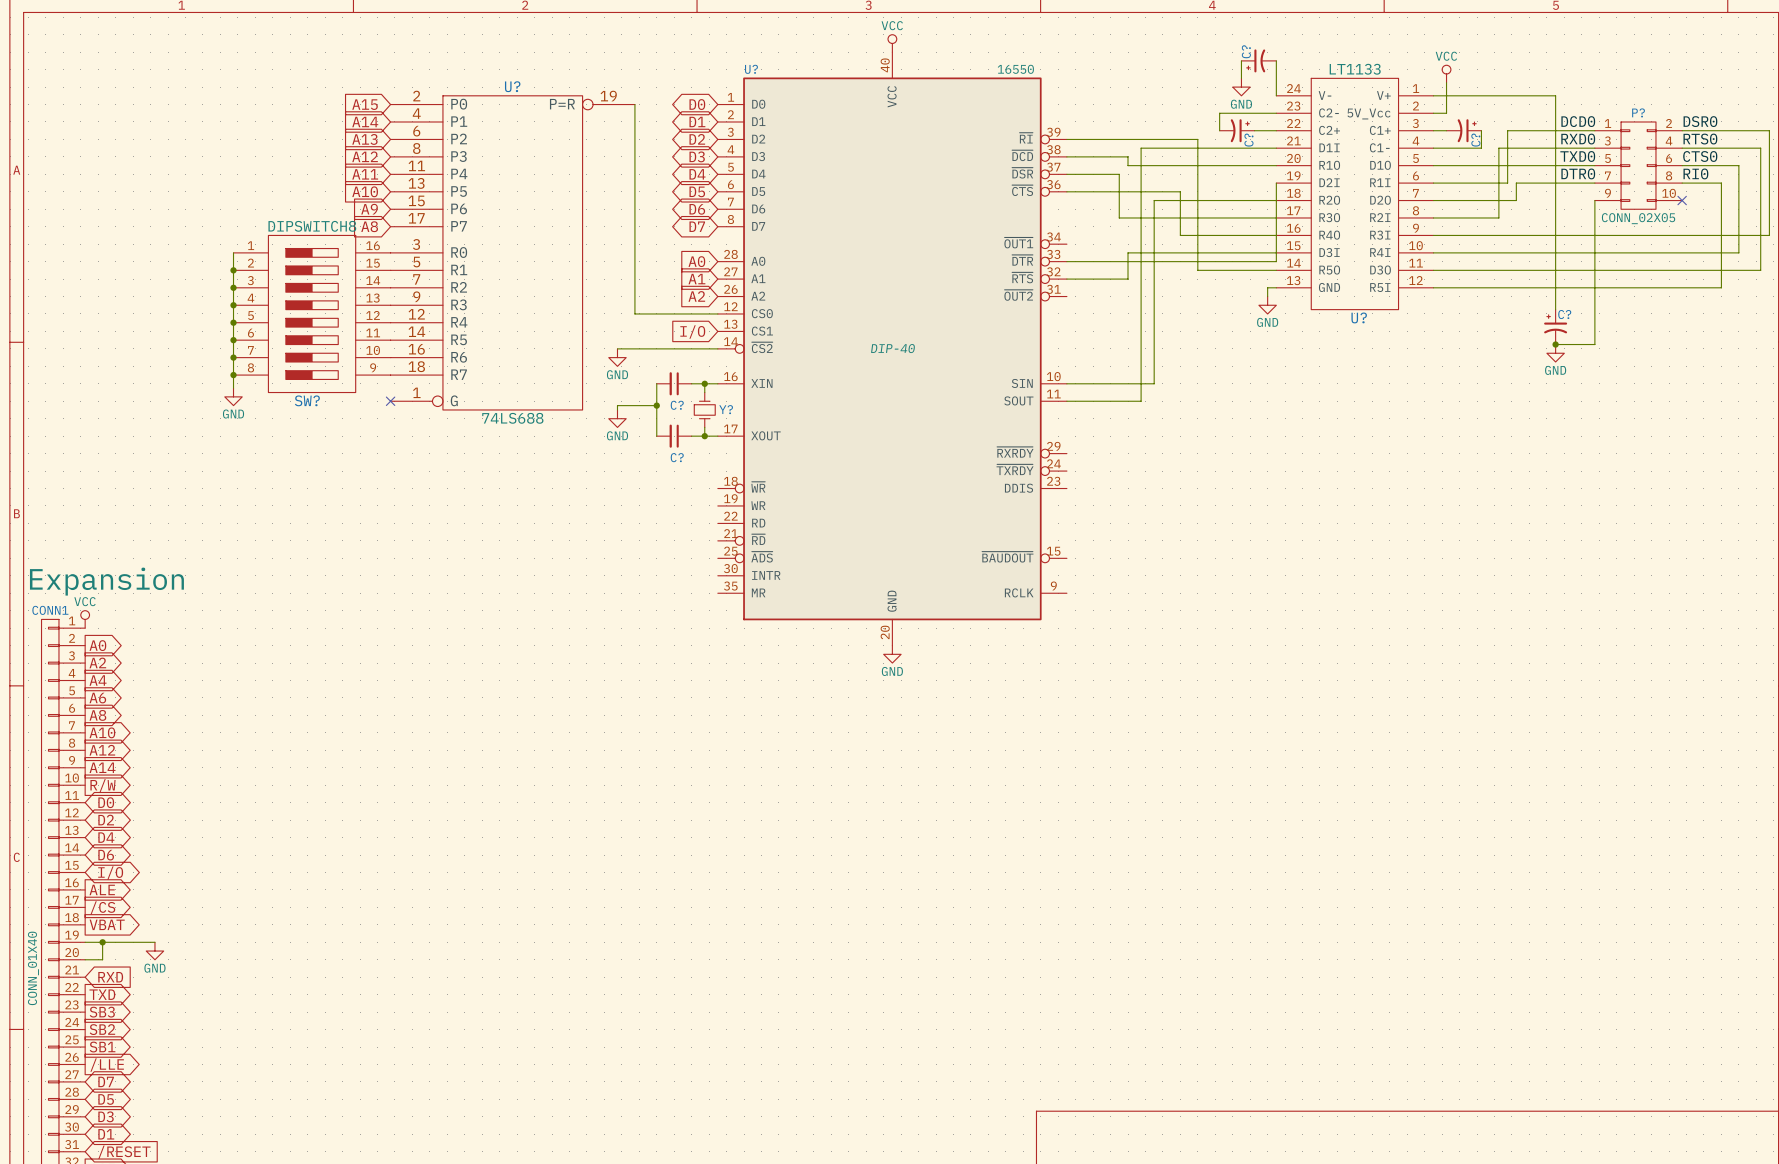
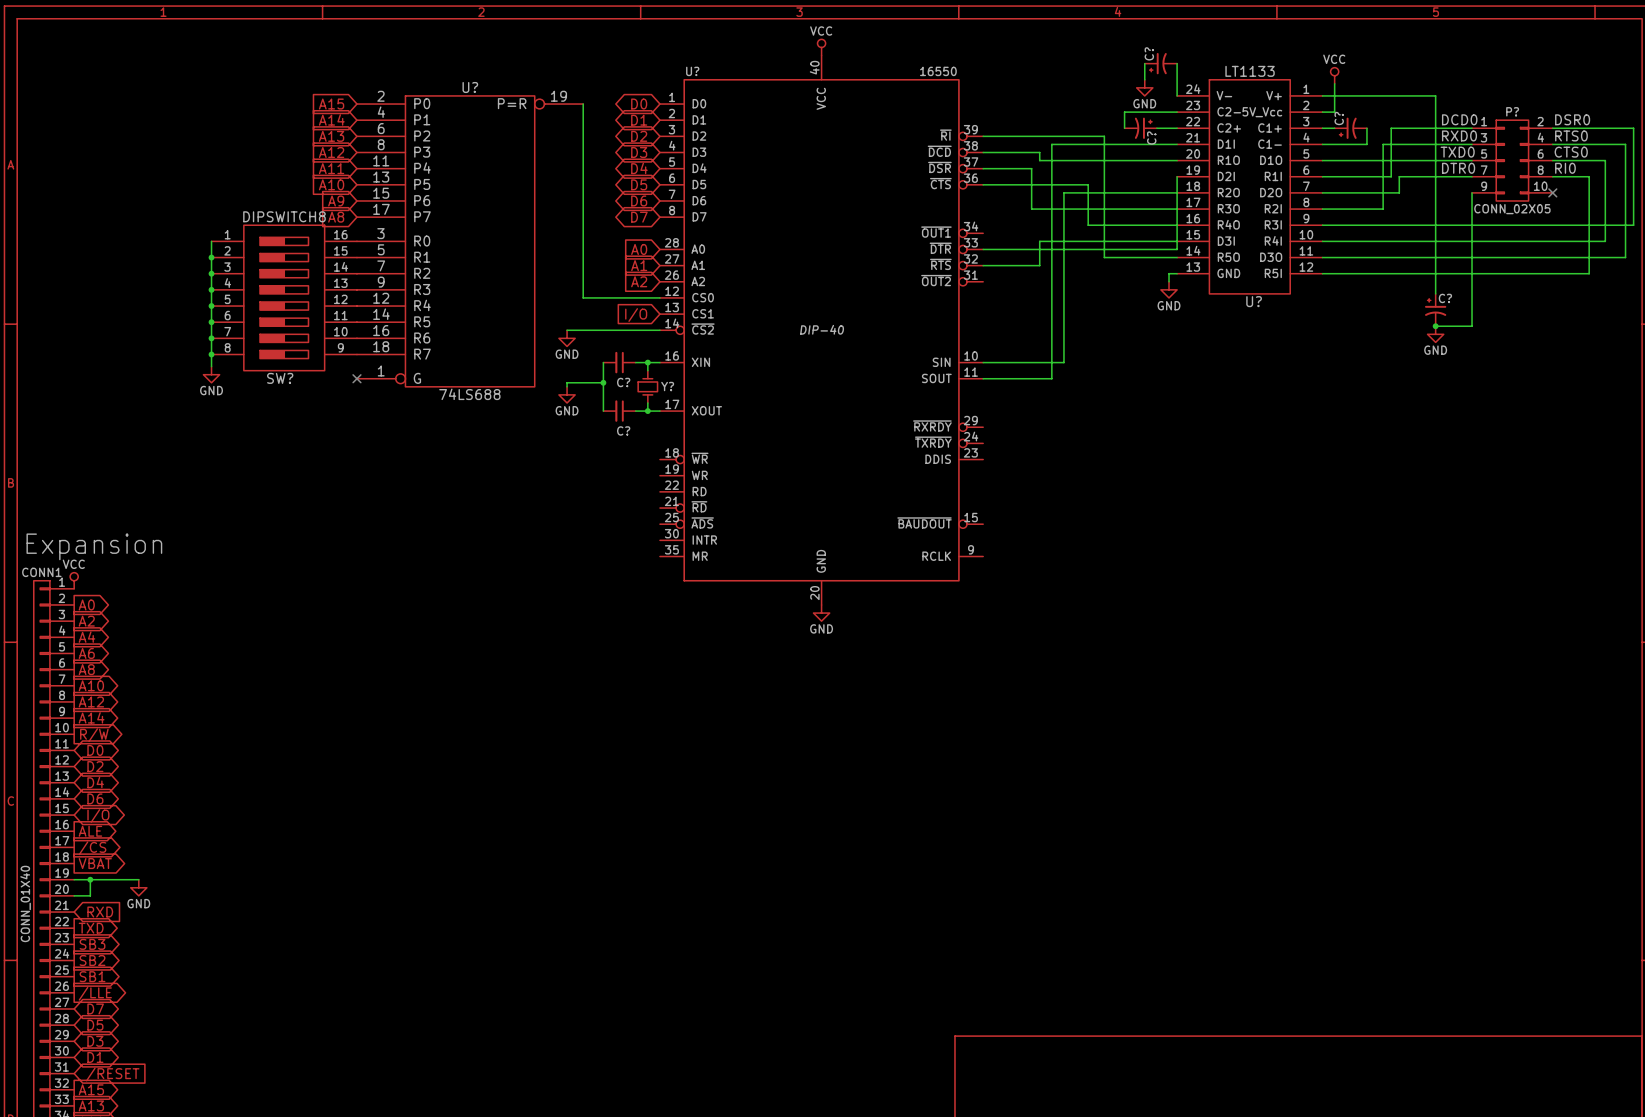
C? rotation: 0° (1466, 130) -> 180° (1348, 128)

